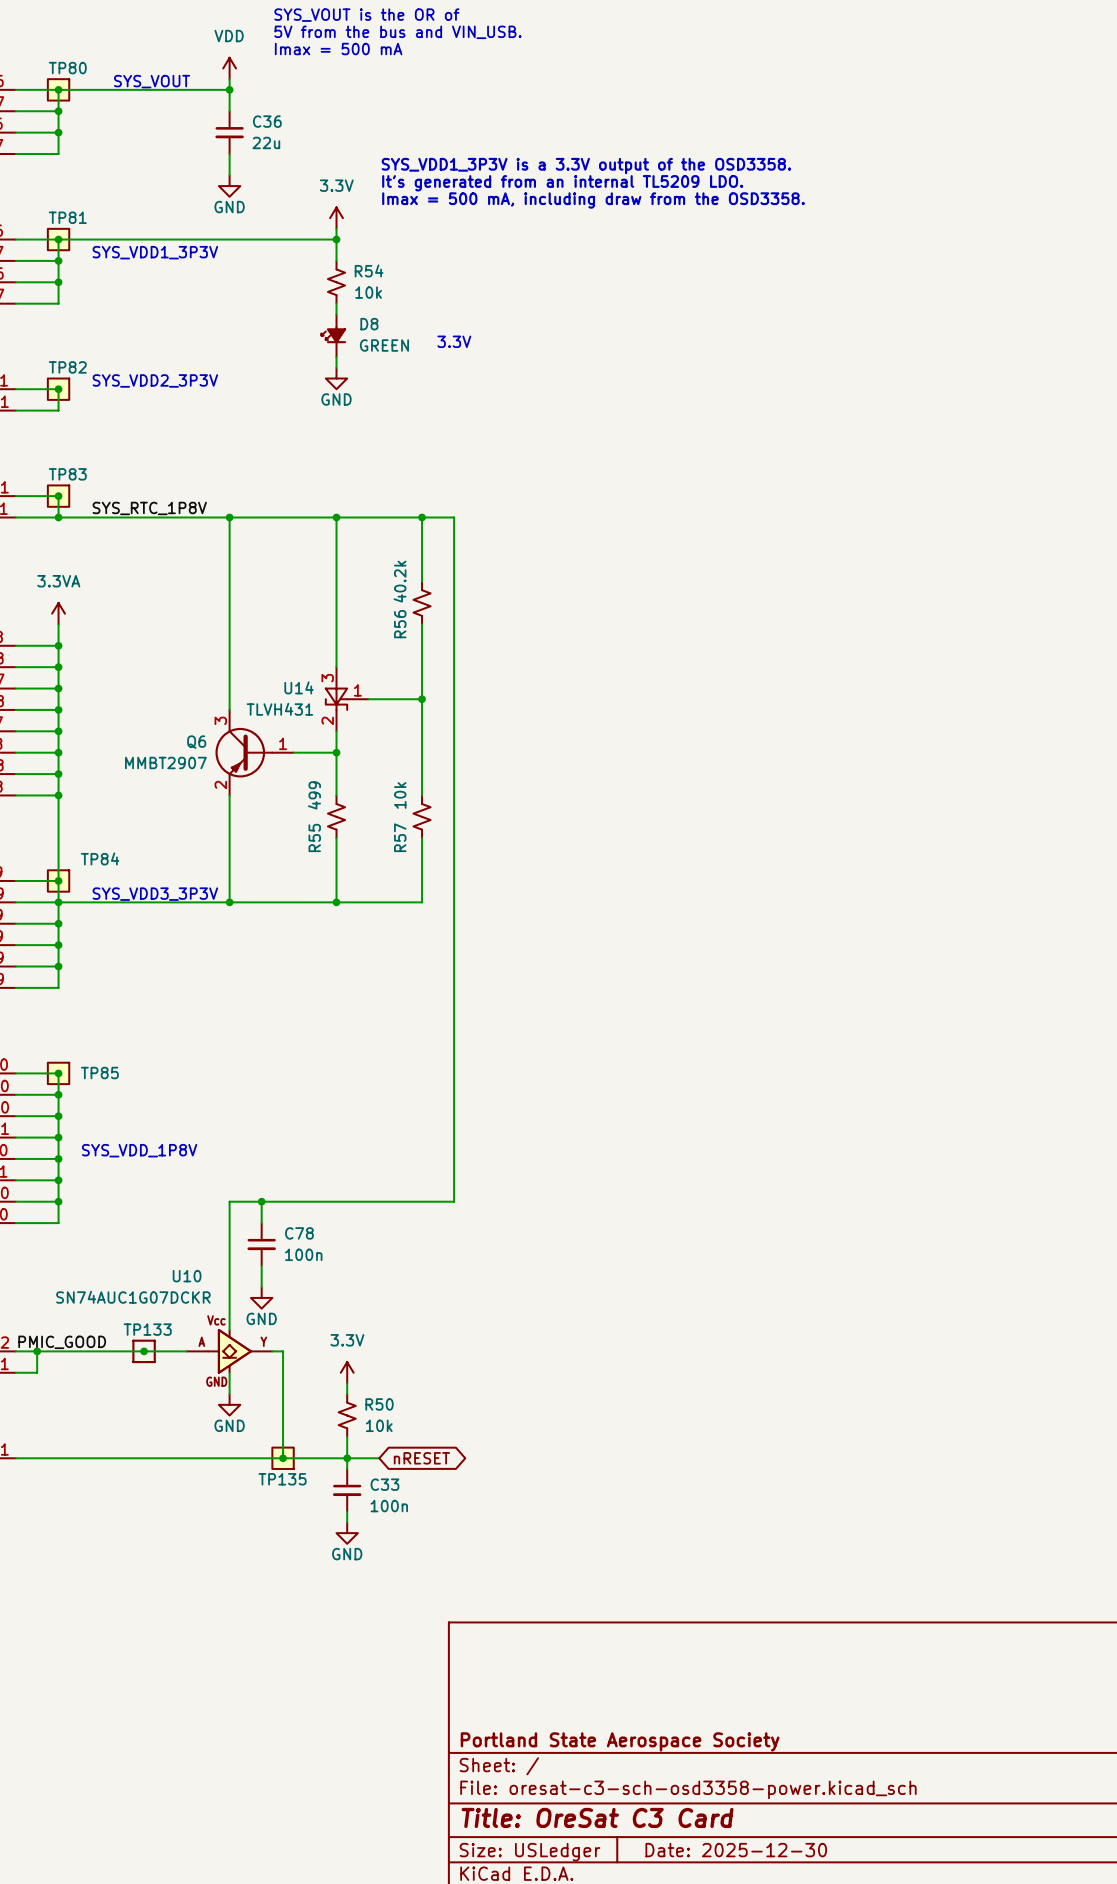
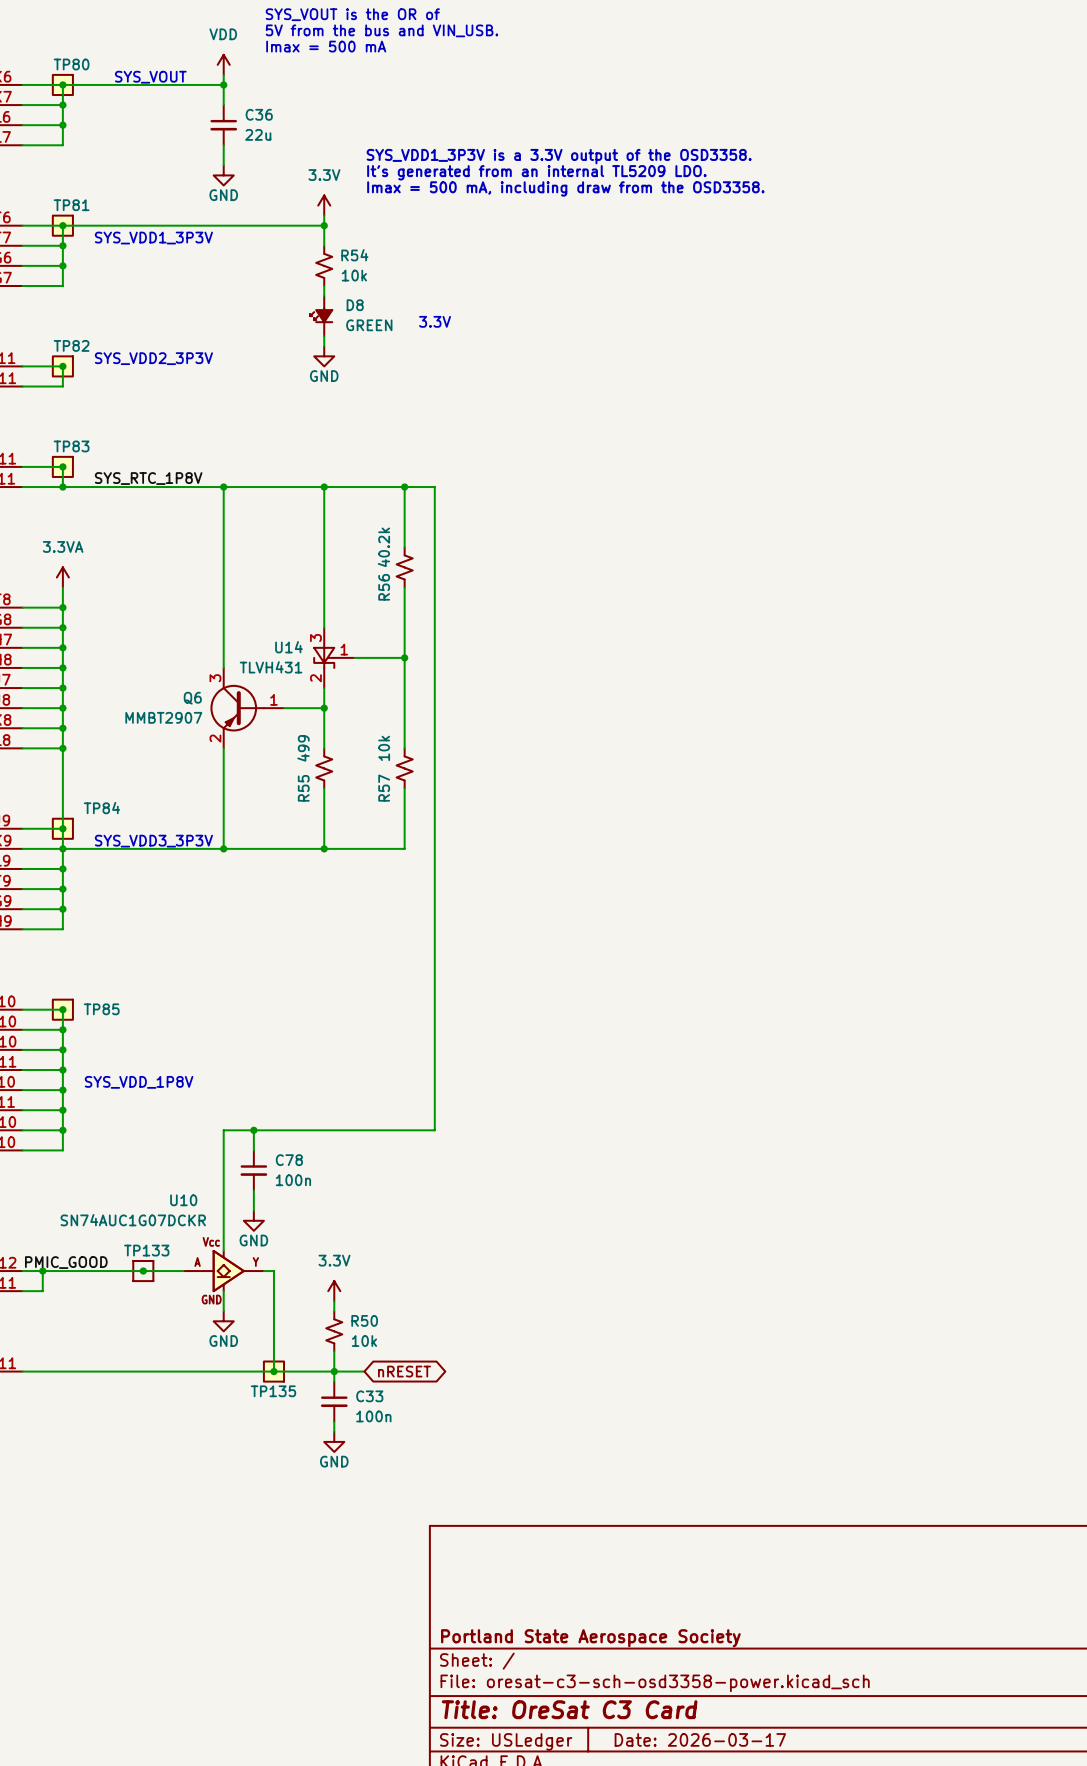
title block: Date: 2025-12-30 (736, 1850) -> Date: 2026-03-17 (700, 1739)

